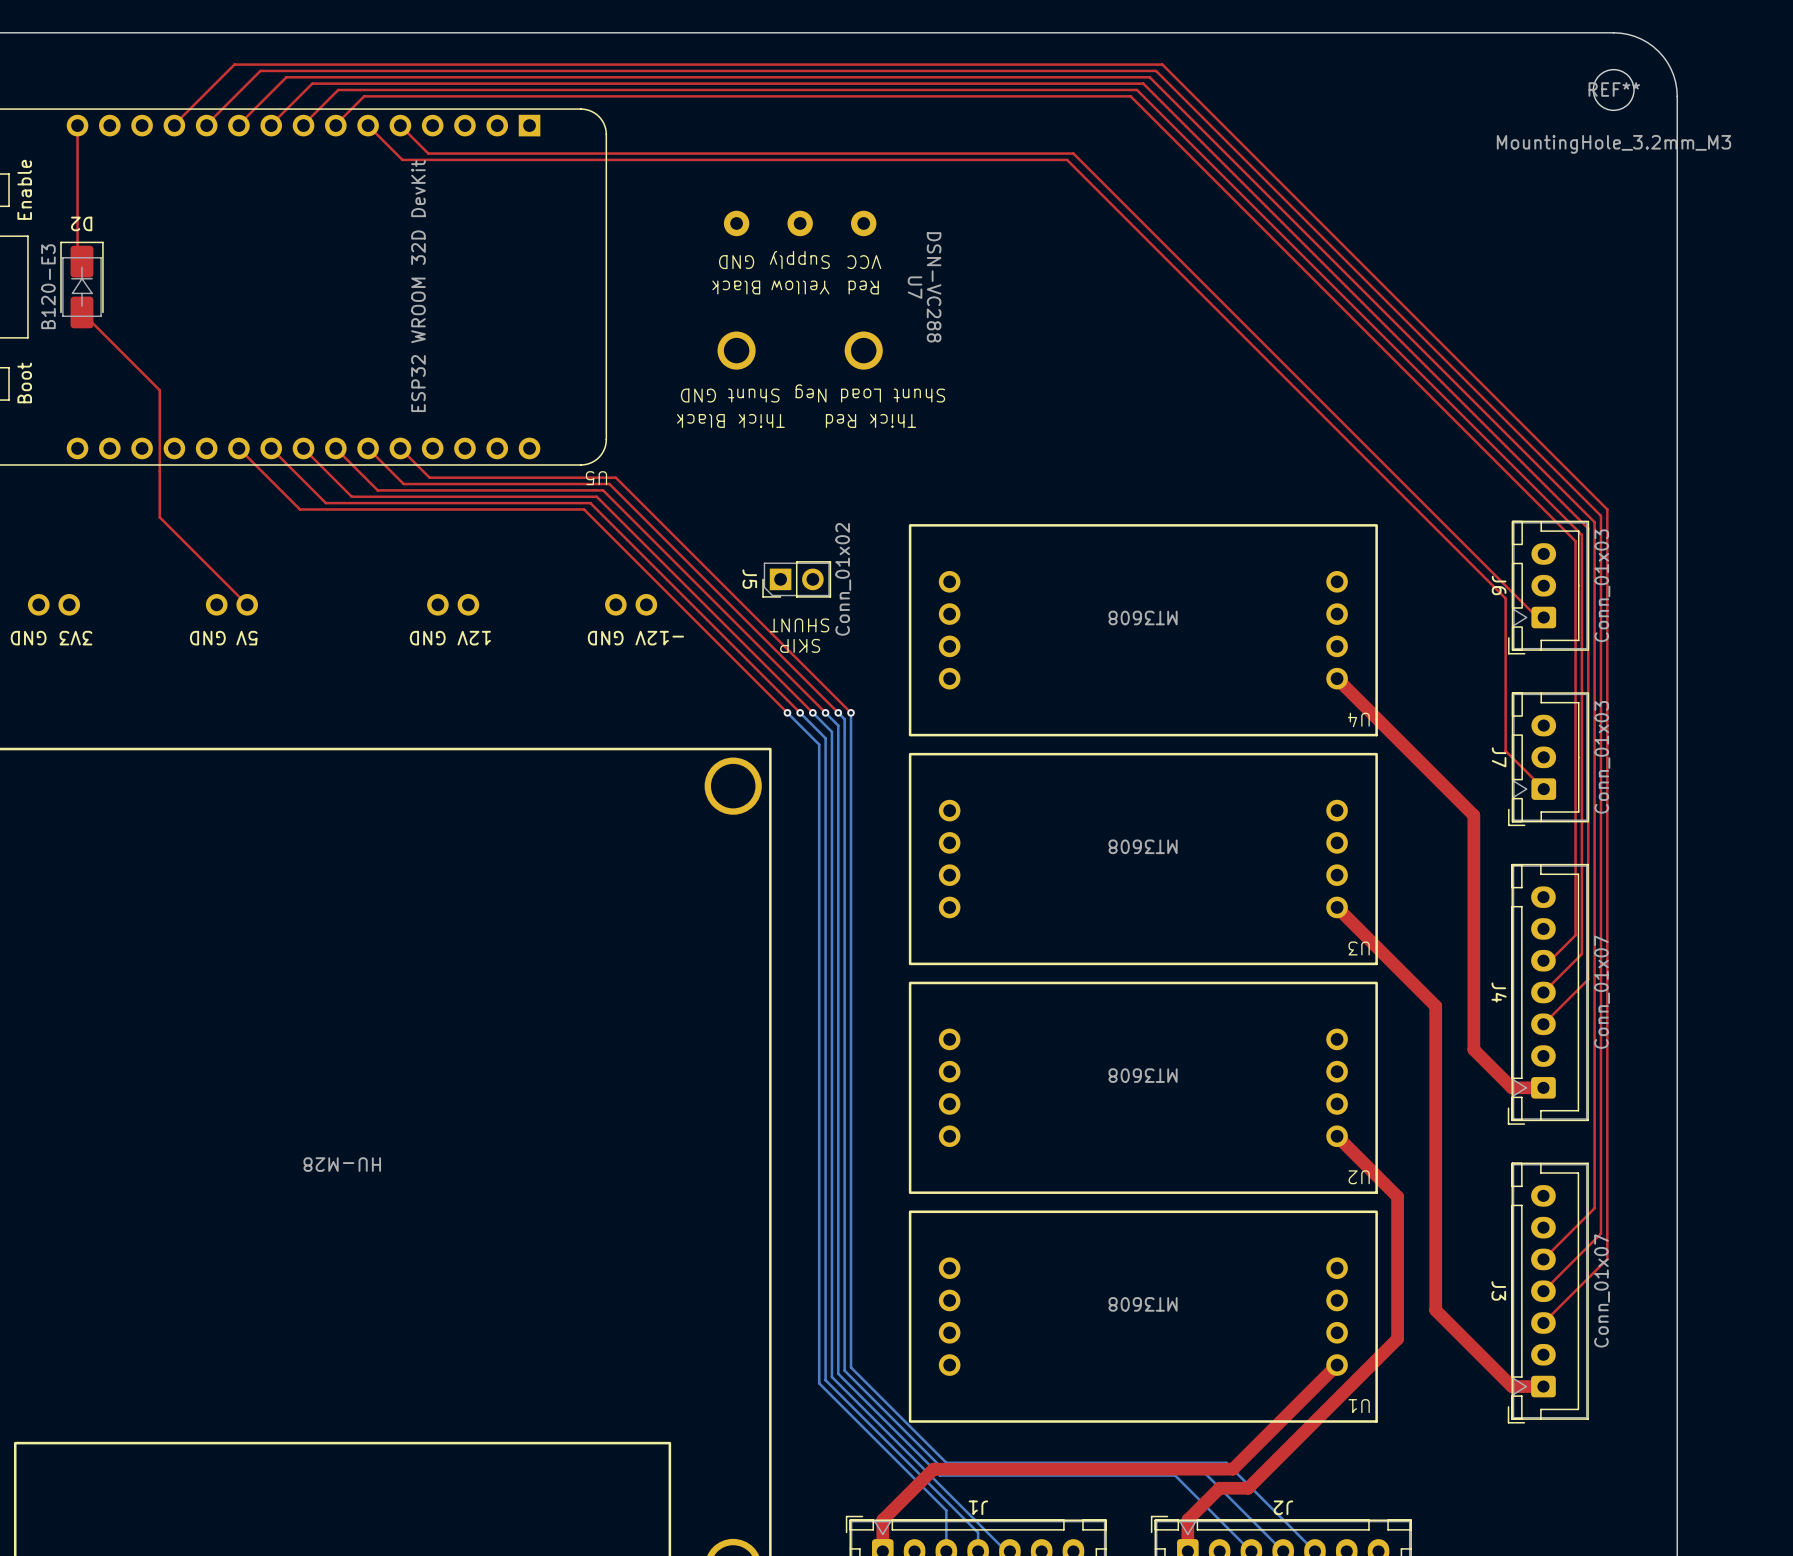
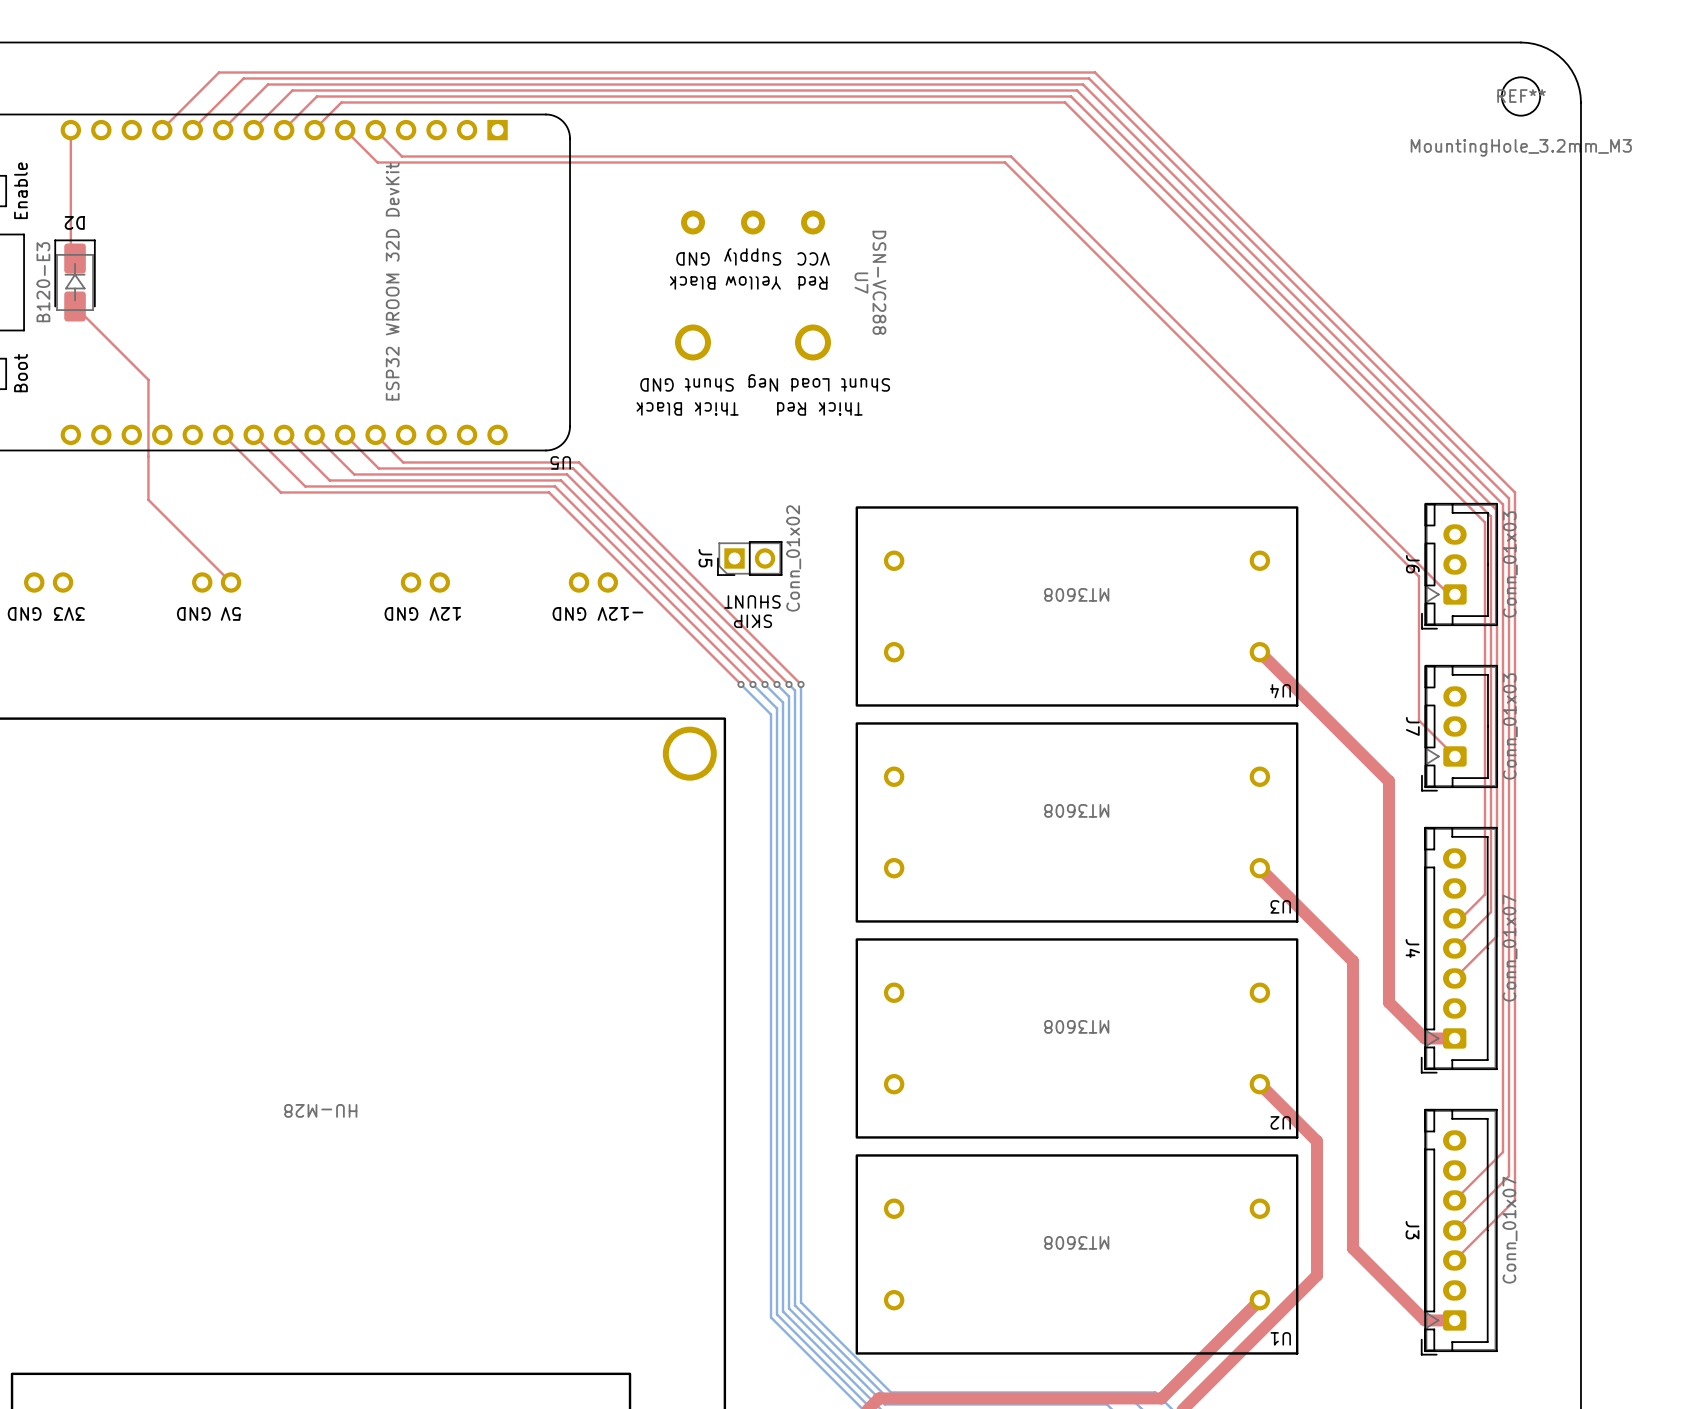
U4 footprint: [908, 524, 1378, 737] -> [855, 506, 1299, 707]
U3 footprint: [908, 752, 1378, 966] -> [855, 722, 1299, 923]
U2 footprint: [908, 981, 1378, 1194] -> [855, 938, 1299, 1139]
U1 footprint: [908, 1210, 1378, 1423] -> [855, 1154, 1299, 1355]

